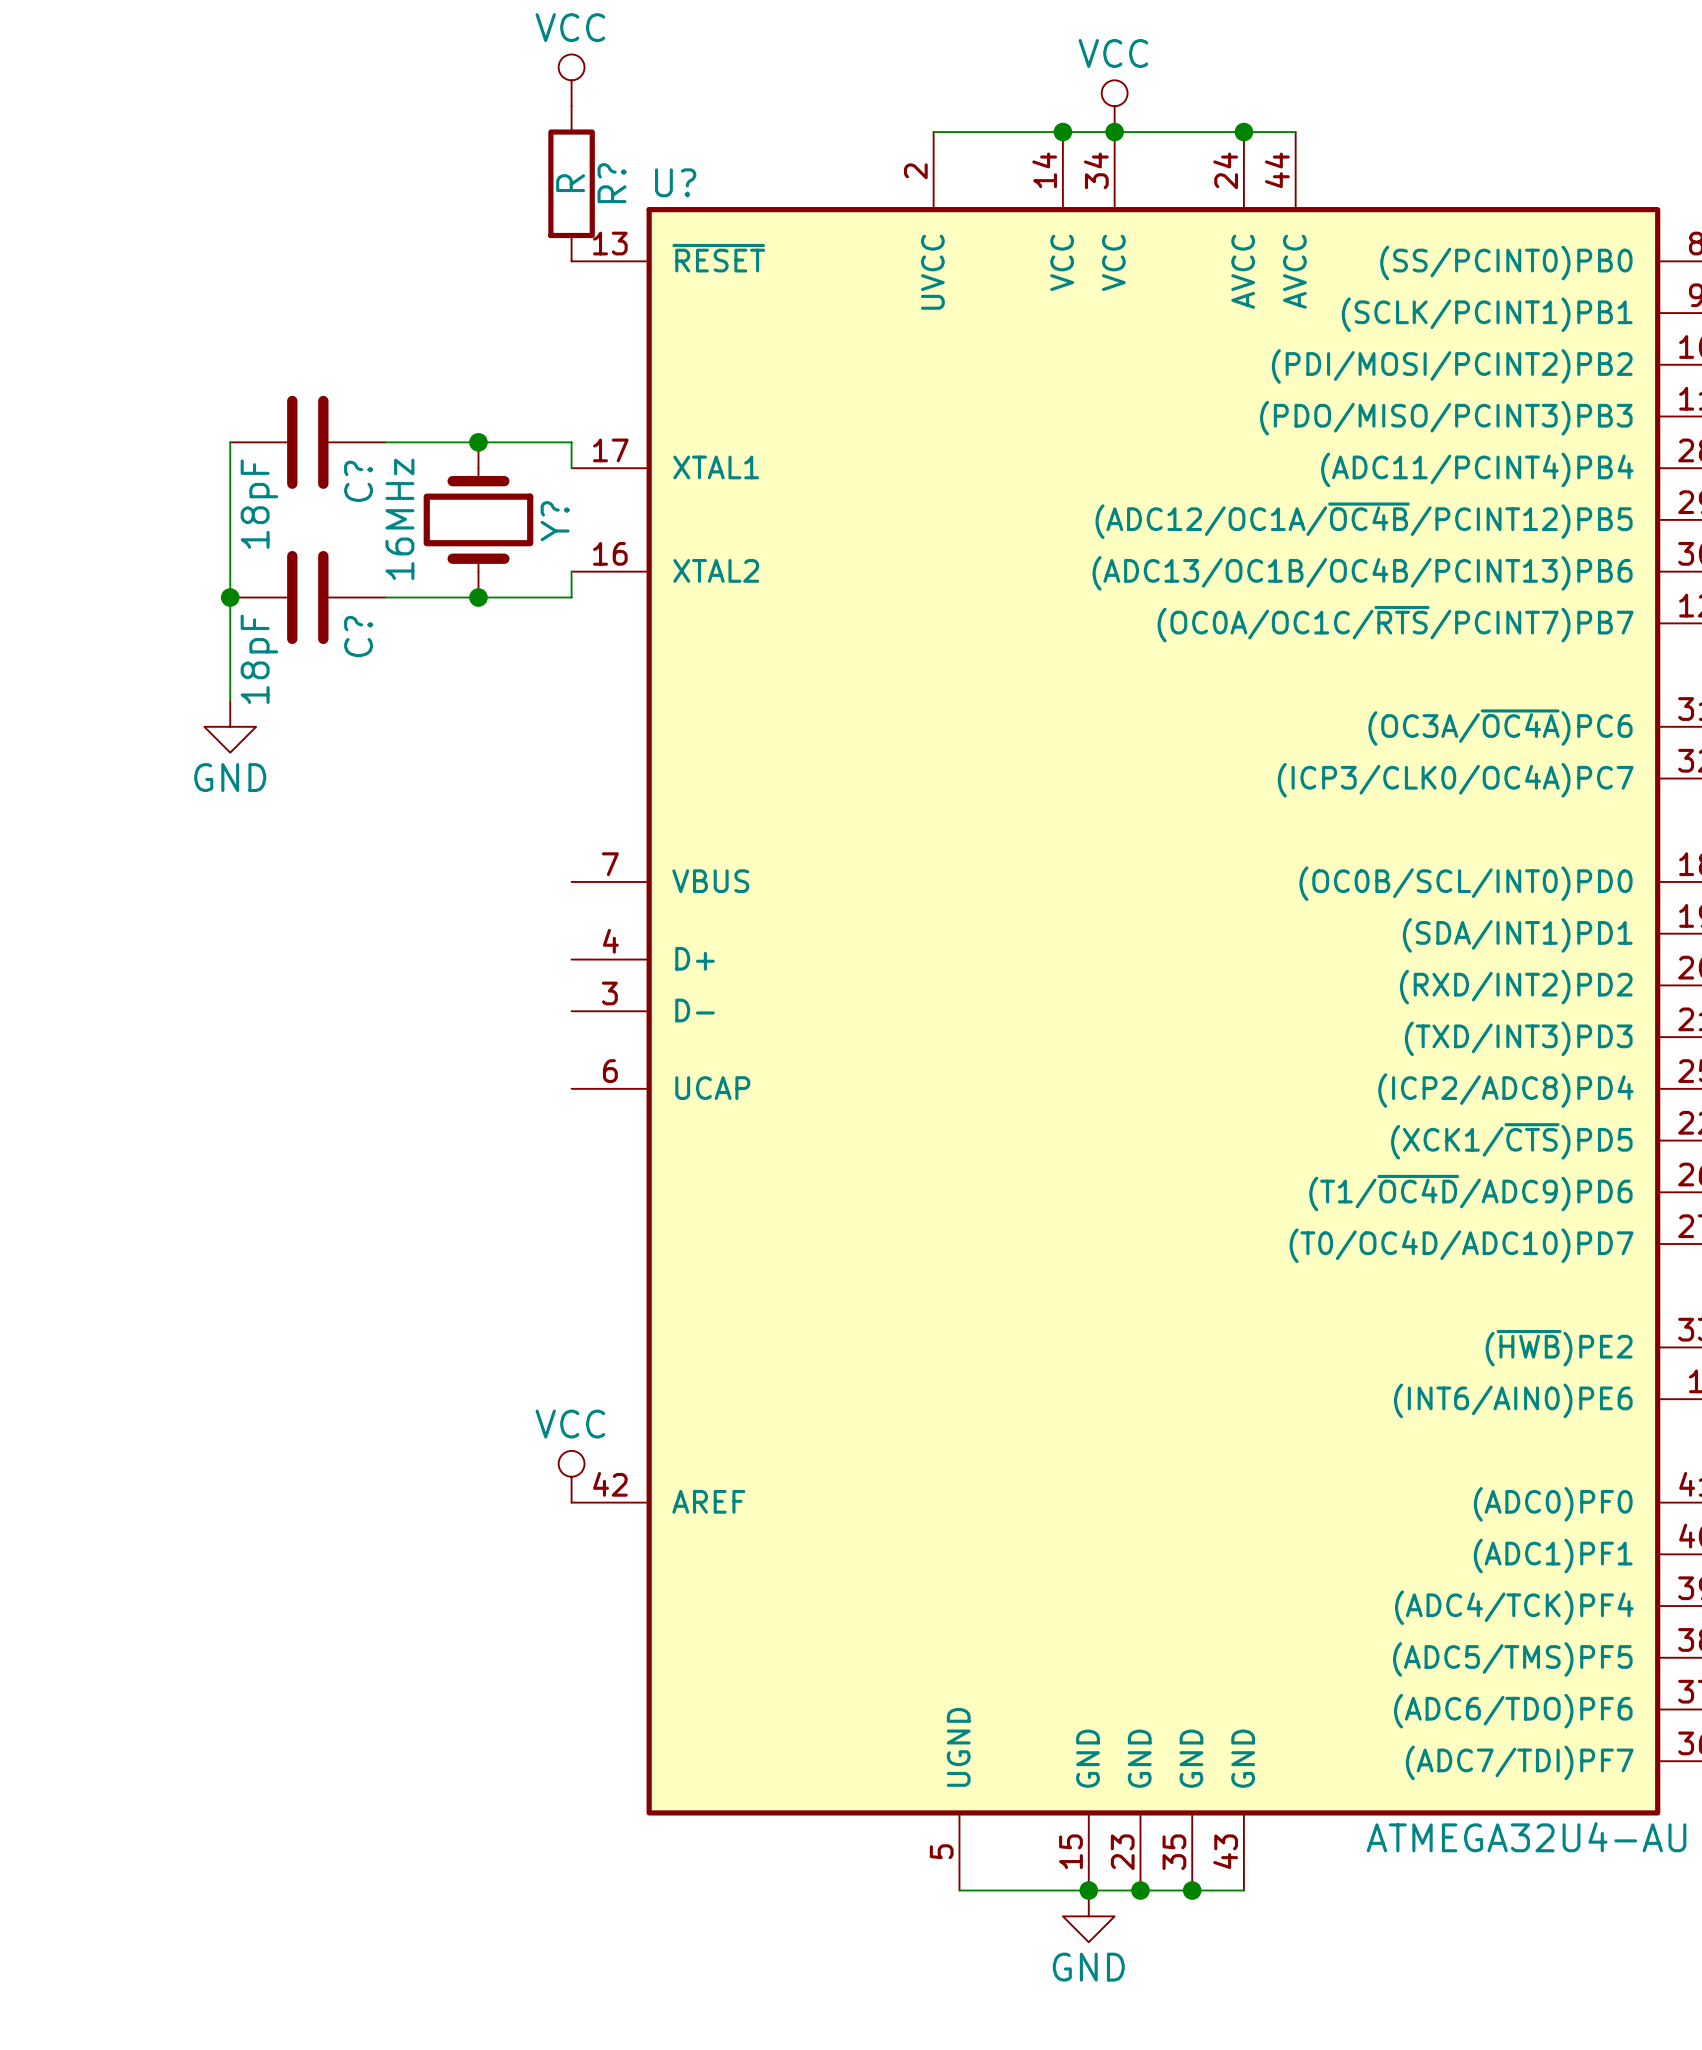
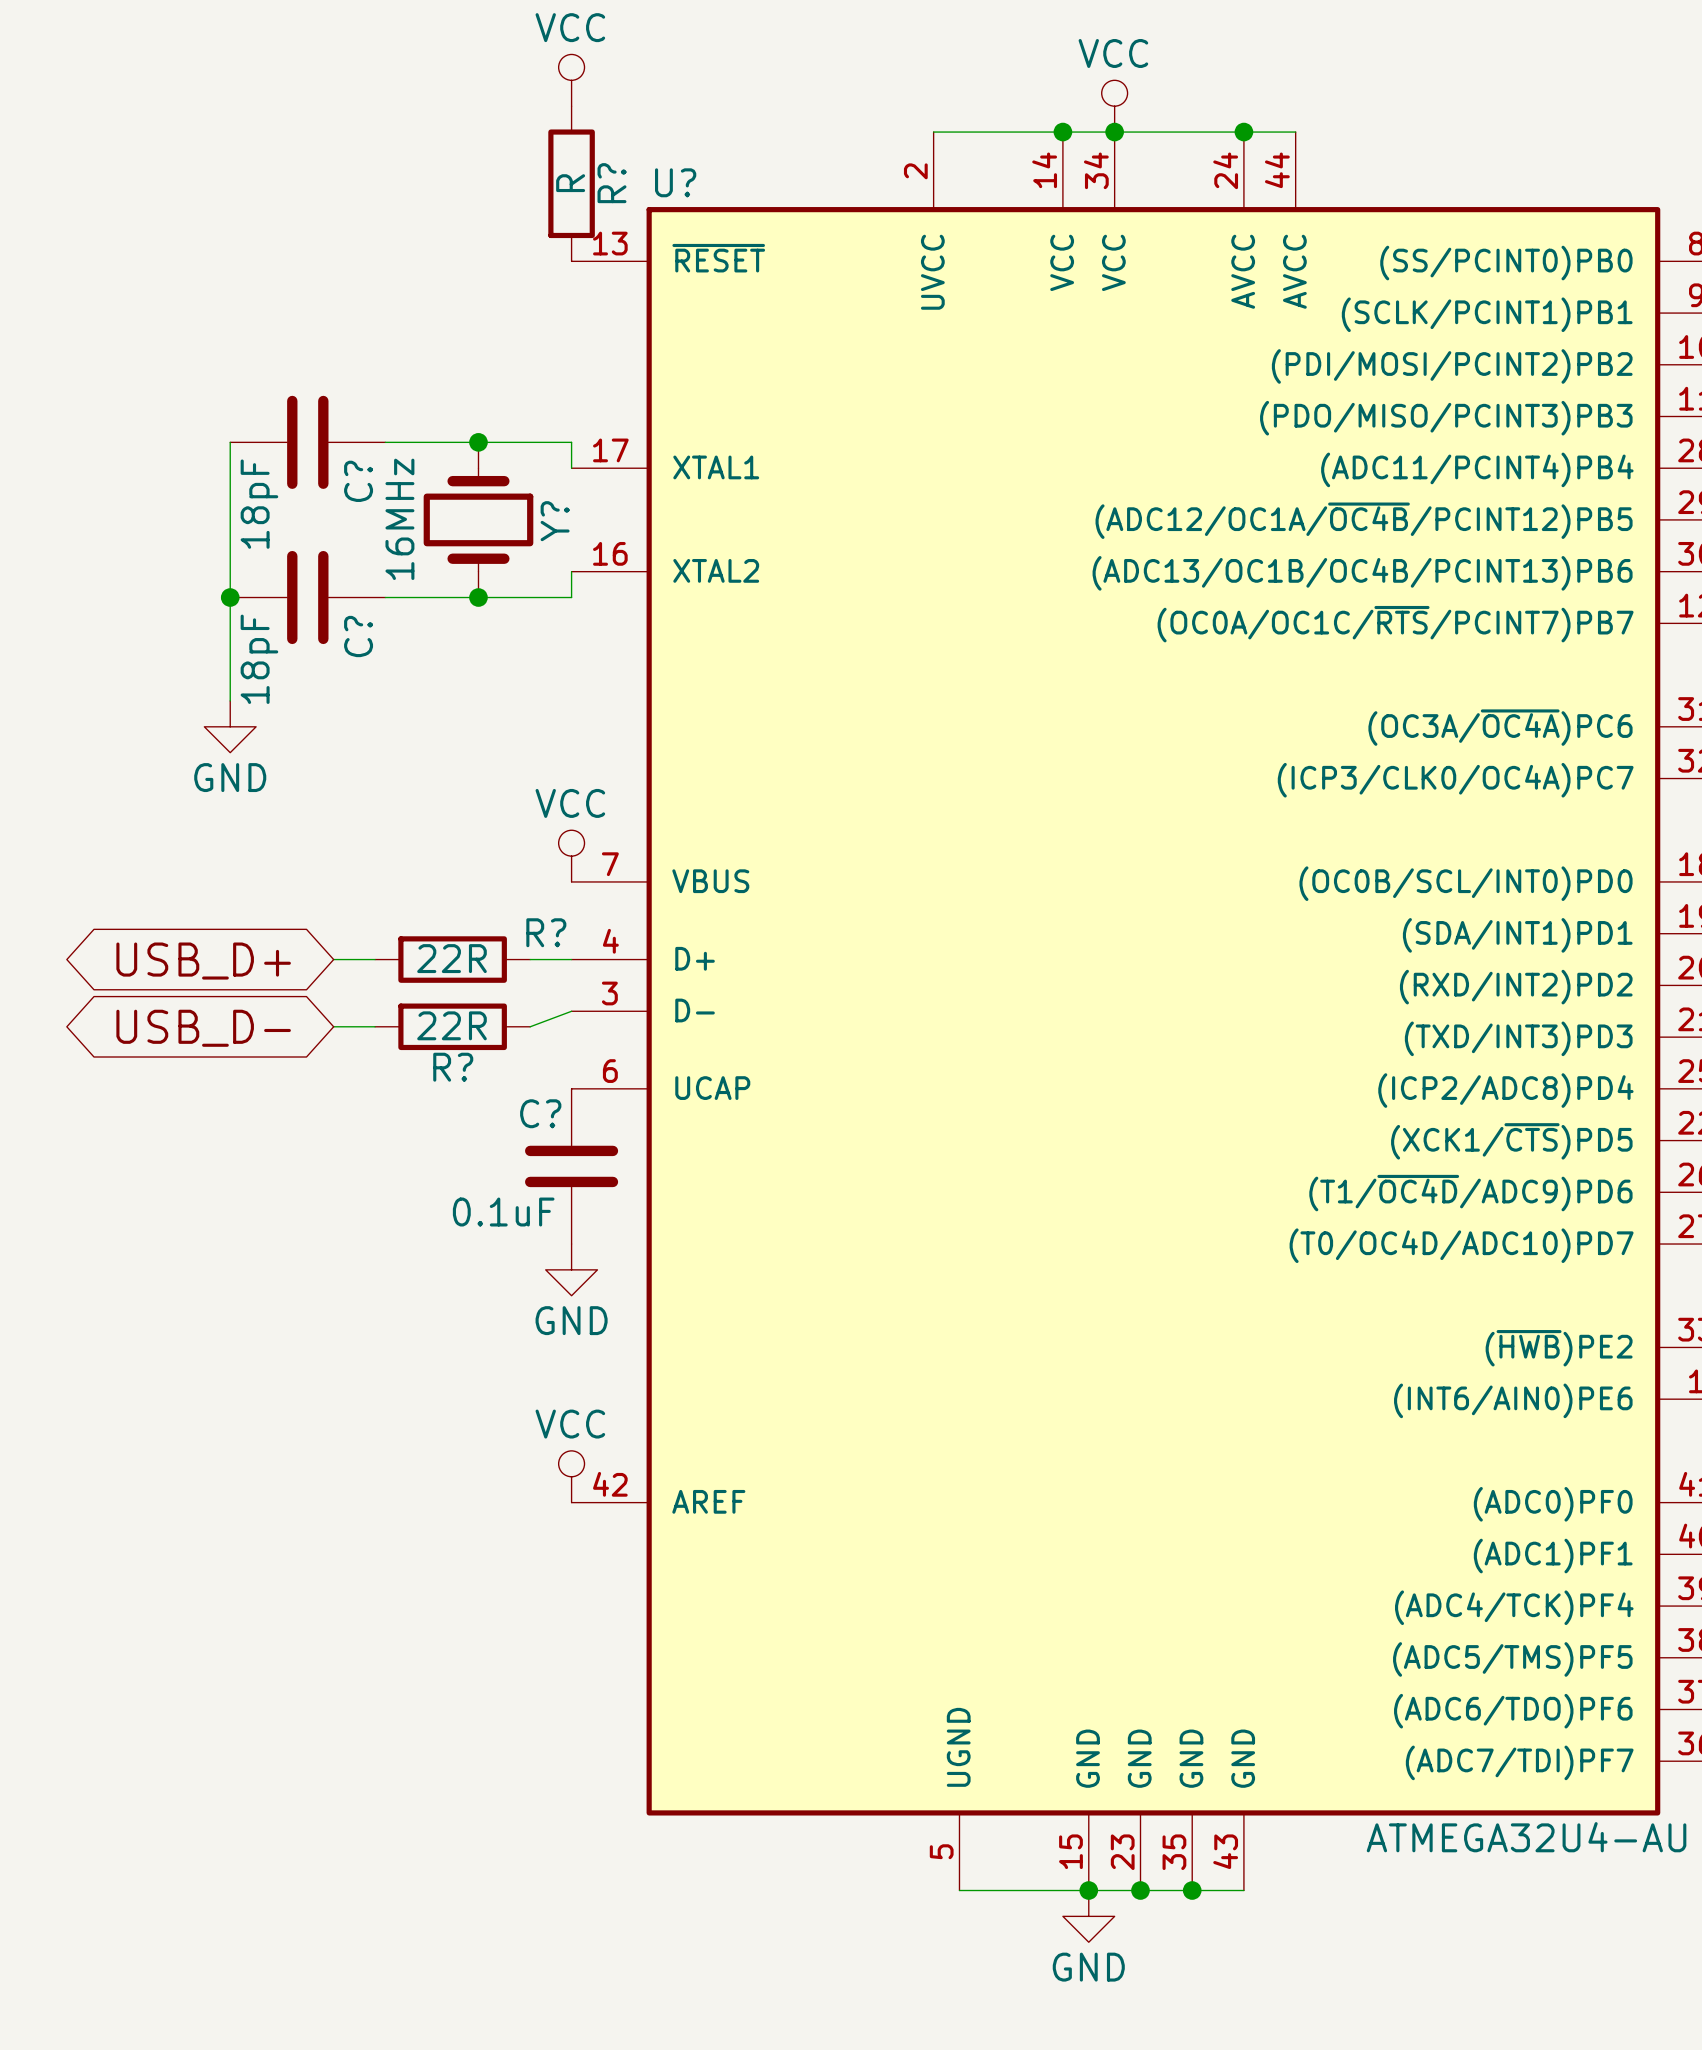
power symbol: none -> VCC (571, 856)
wire: none -> (333, 959) (375, 959)
R?: none -> 22R (452, 959)
wire: none -> (530, 959) (571, 959)
global label: none -> USB_D+ (203, 961)
wire: none -> (571, 1011) (530, 1026)
wire: none -> (333, 1026) (375, 1026)
R?: none -> 22R (452, 1026)
global label: none -> USB_D- (203, 1028)
C?: none -> 0.1uF (571, 1166)
power symbol: none -> GND (571, 1269)

